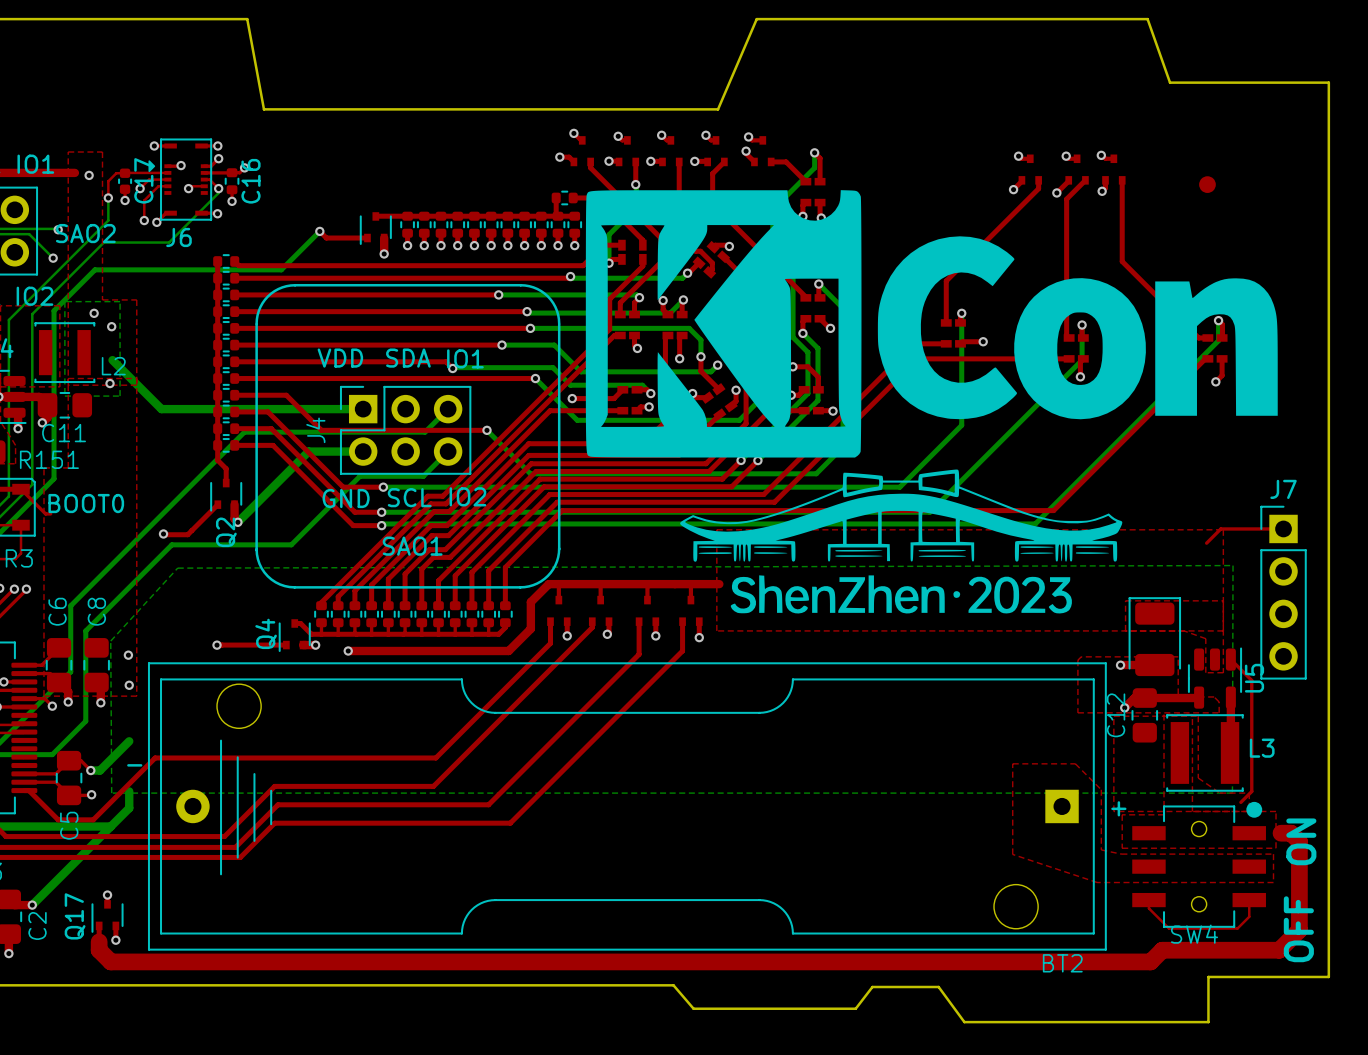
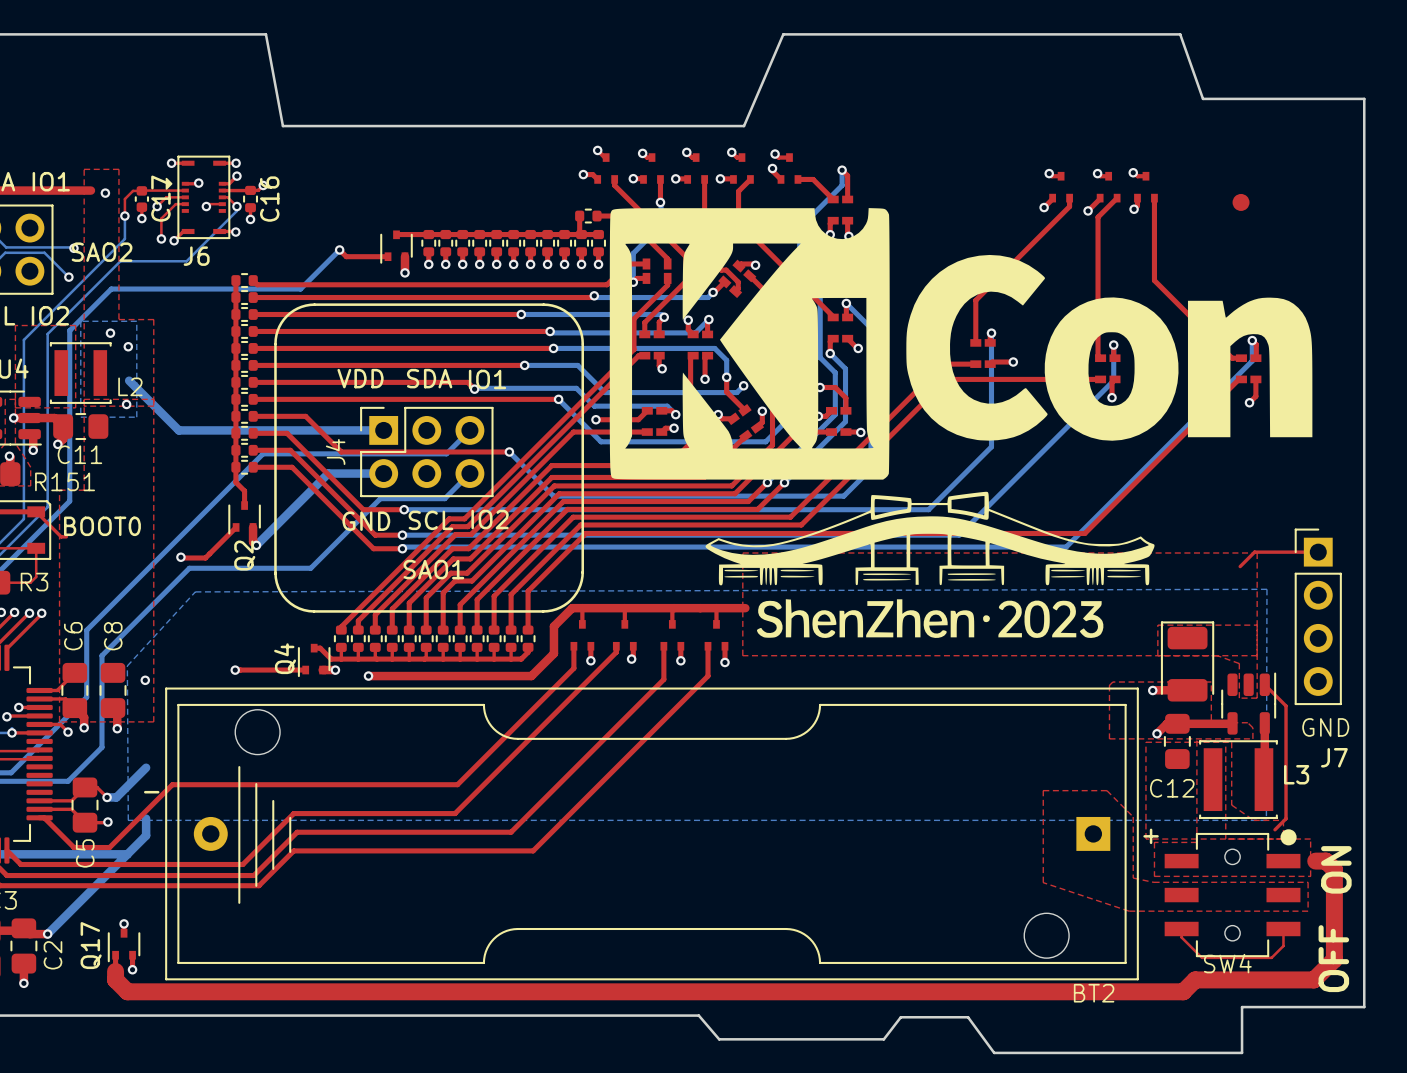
J7 name position: J7 (1283, 489) -> J7 (1334, 757)
U5 name: U5 (1254, 678) -> none
via: (129, 685) -> none
text: none -> GND (1325, 727)
C12 name rotation: 0° (1116, 715) -> 90° clockwise (1172, 788)

